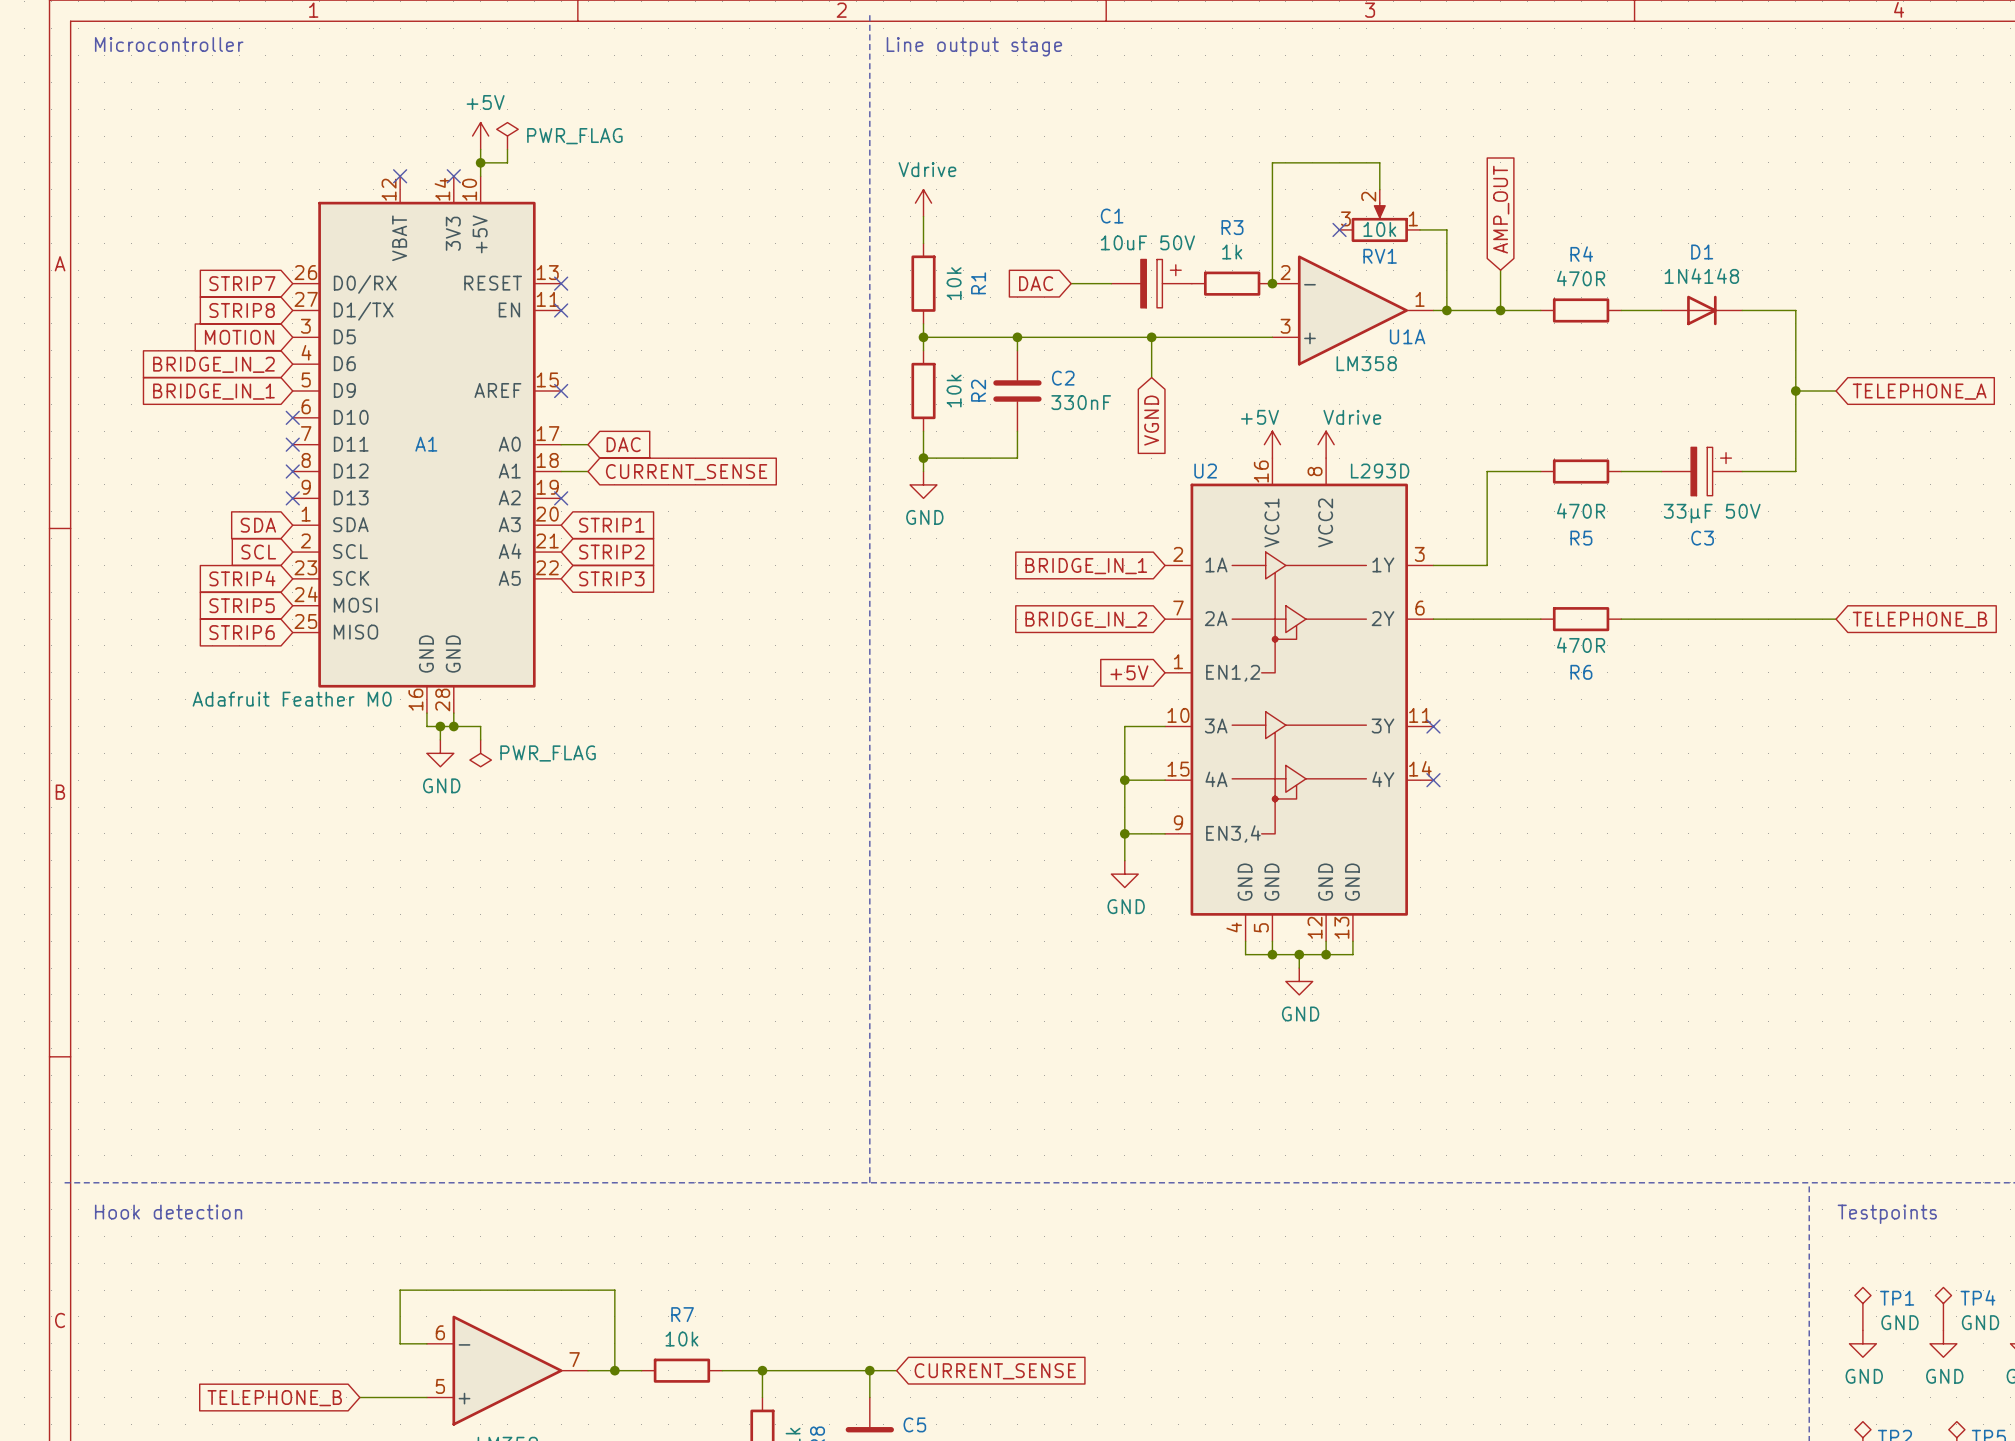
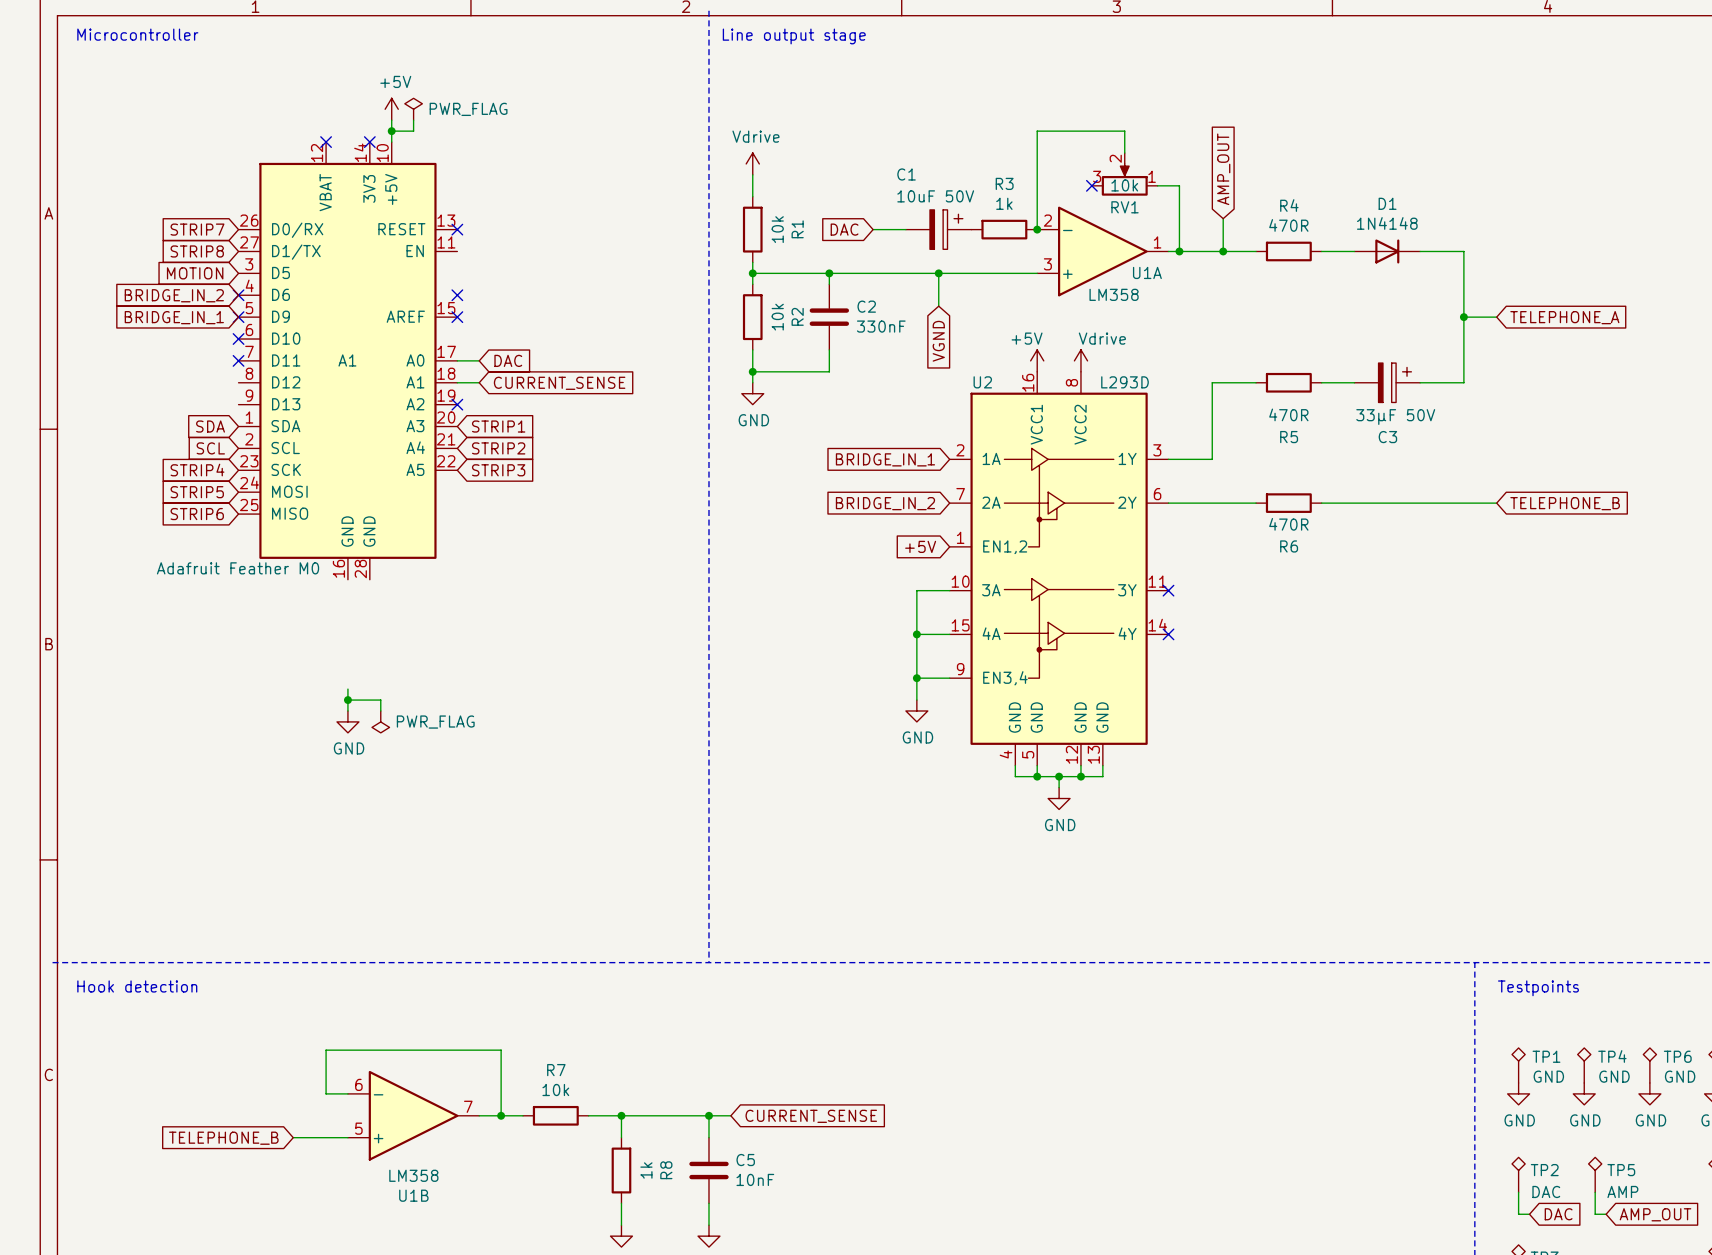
no-connect mark position: (561, 310) -> (457, 295)
no-connect mark: none -> (238, 295)
no-connect mark: none -> (238, 317)
no-connect mark: (292, 471) -> none
no-connect mark: (292, 498) -> none
wire: (426, 713) (426, 726) (480, 726) (480, 739) -> none
wire: (453, 713) (453, 726) -> none
wire: (440, 726) (440, 739) -> none
junction: (440, 726) -> none
junction: (453, 726) -> none
power symbol position: GND (440, 753) -> GND (347, 721)
power symbol position: PWR_FLAG (480, 753) -> PWR_FLAG (380, 721)
wire: none -> (347, 689) (347, 710)
wire: none -> (347, 700) (380, 700) (380, 710)
junction: none -> (347, 700)

